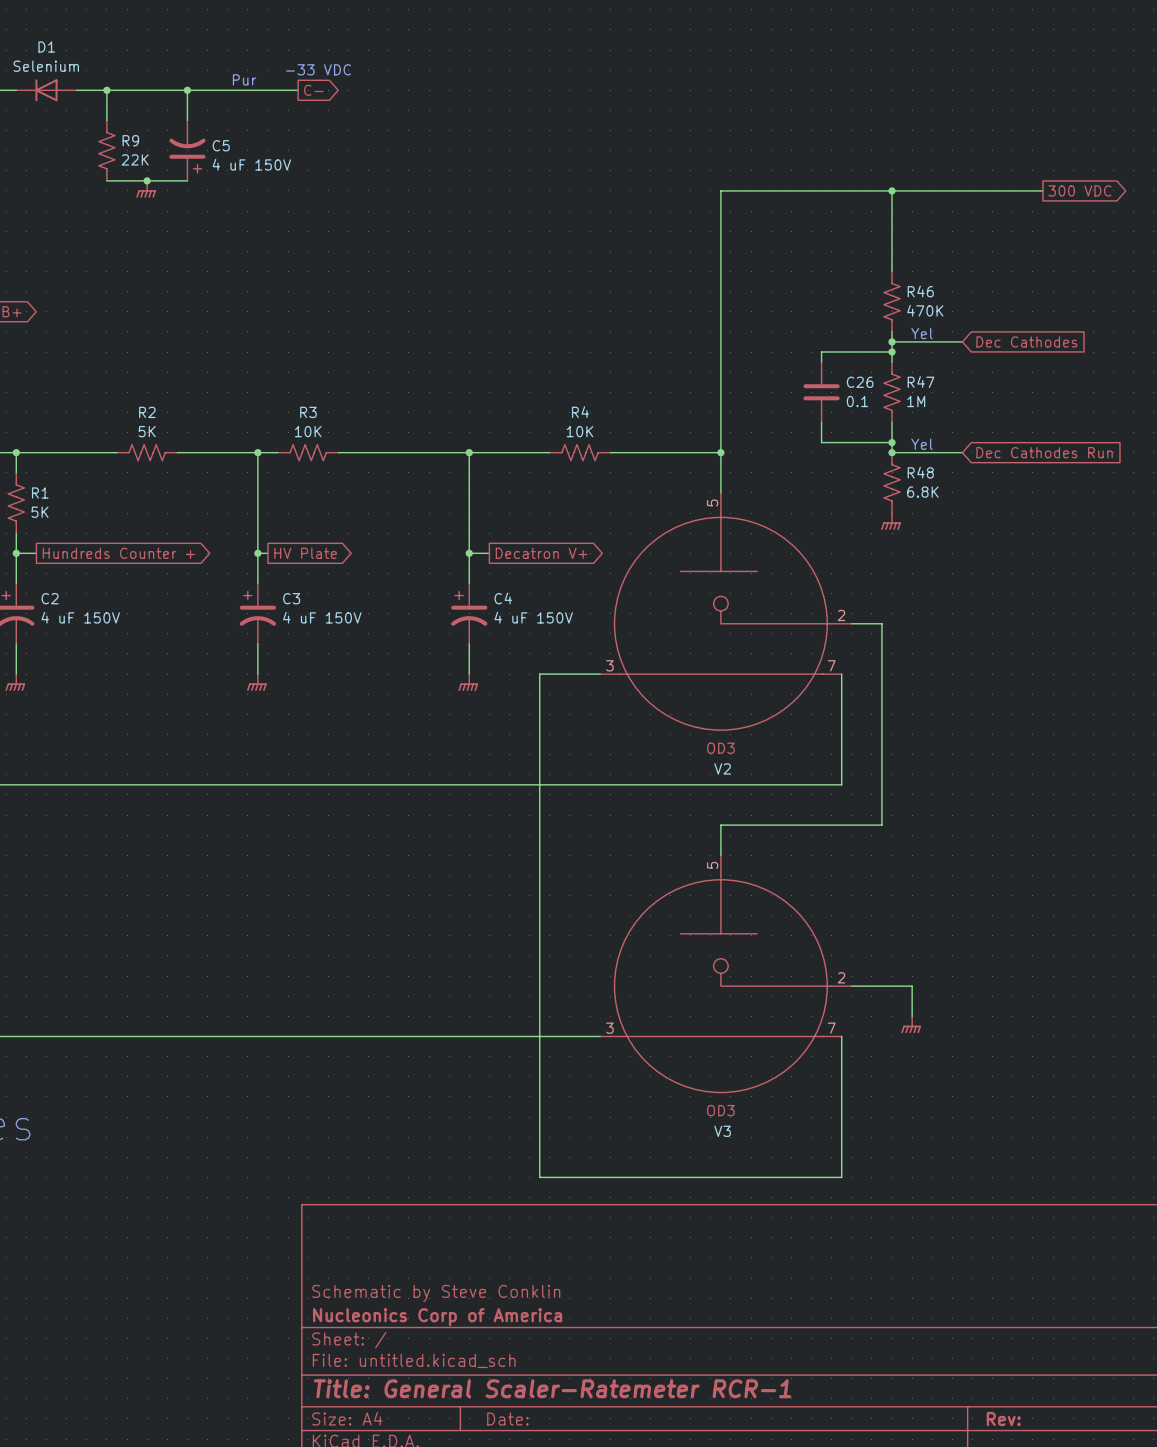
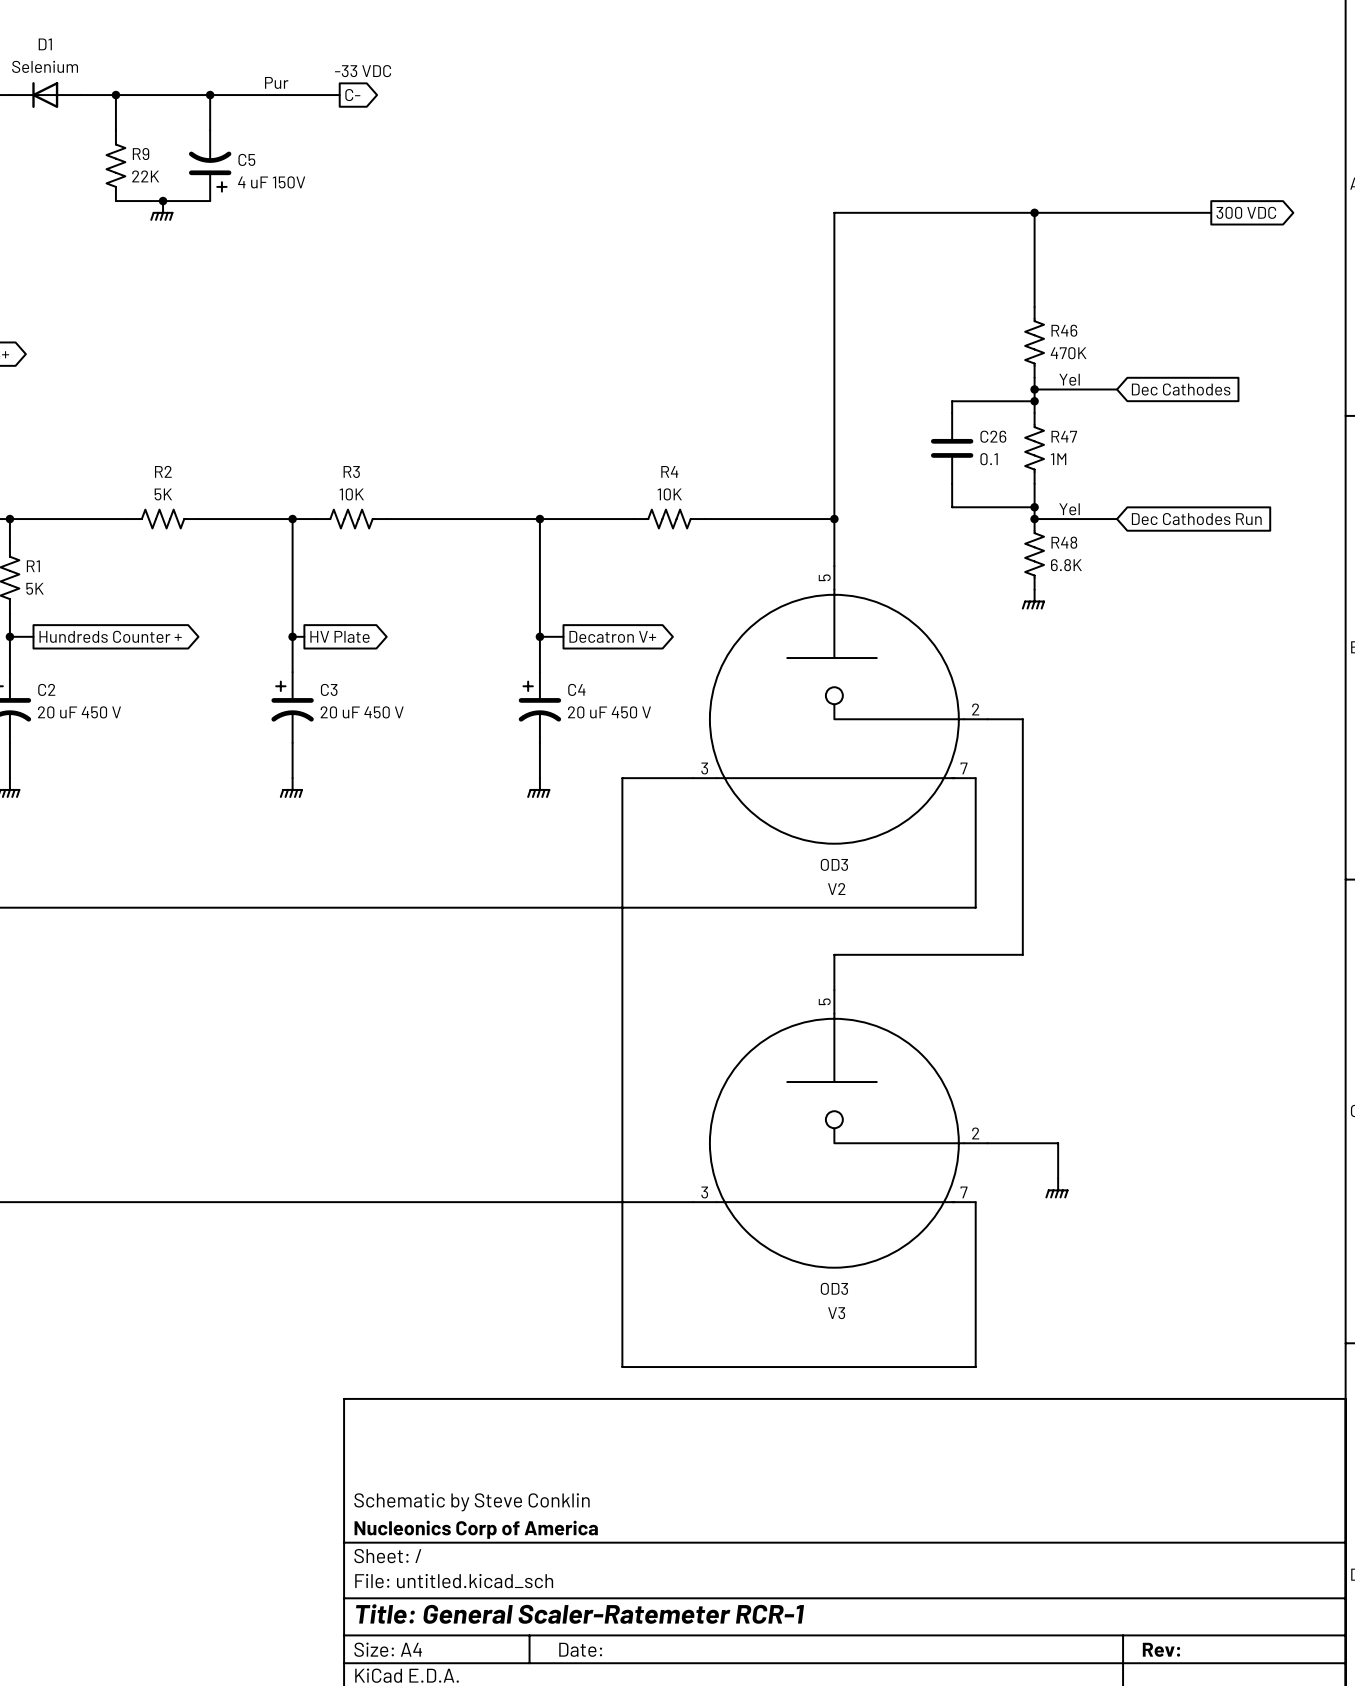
C2 value: 4 uF 150V (80, 617) -> 20 uF 450 V (79, 712)
C3 value: 4 uF 150V (322, 617) -> 20 uF 450 V (362, 712)
C4 value: 4 uF 150V (533, 617) -> 20 uF 450 V (609, 712)

